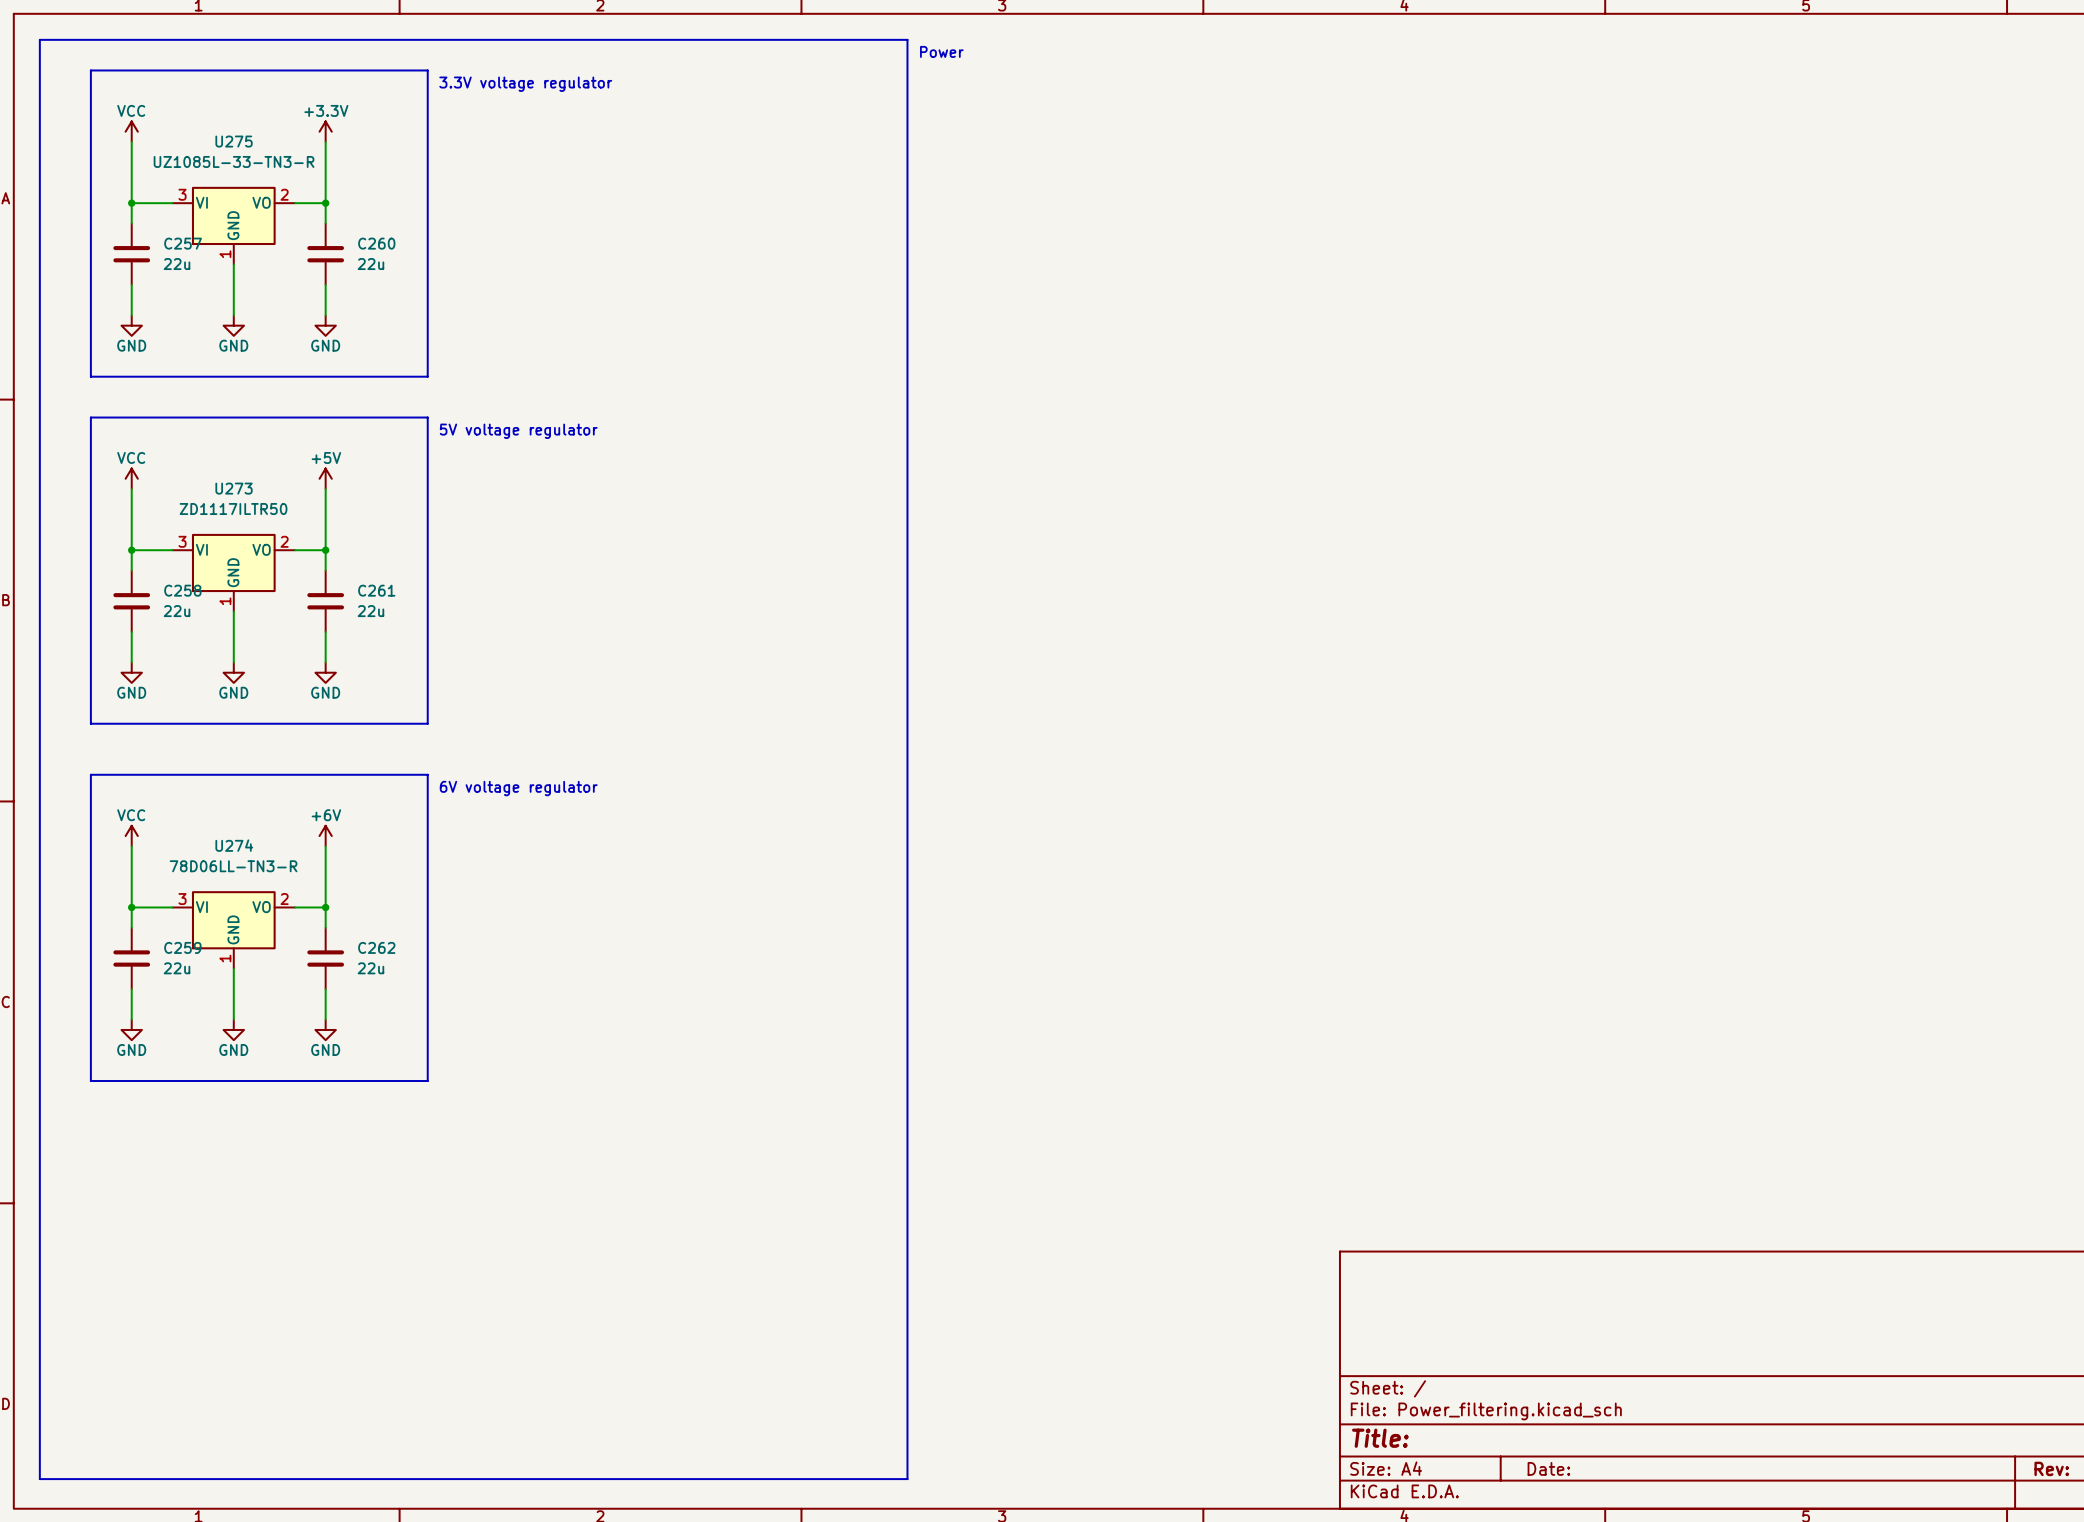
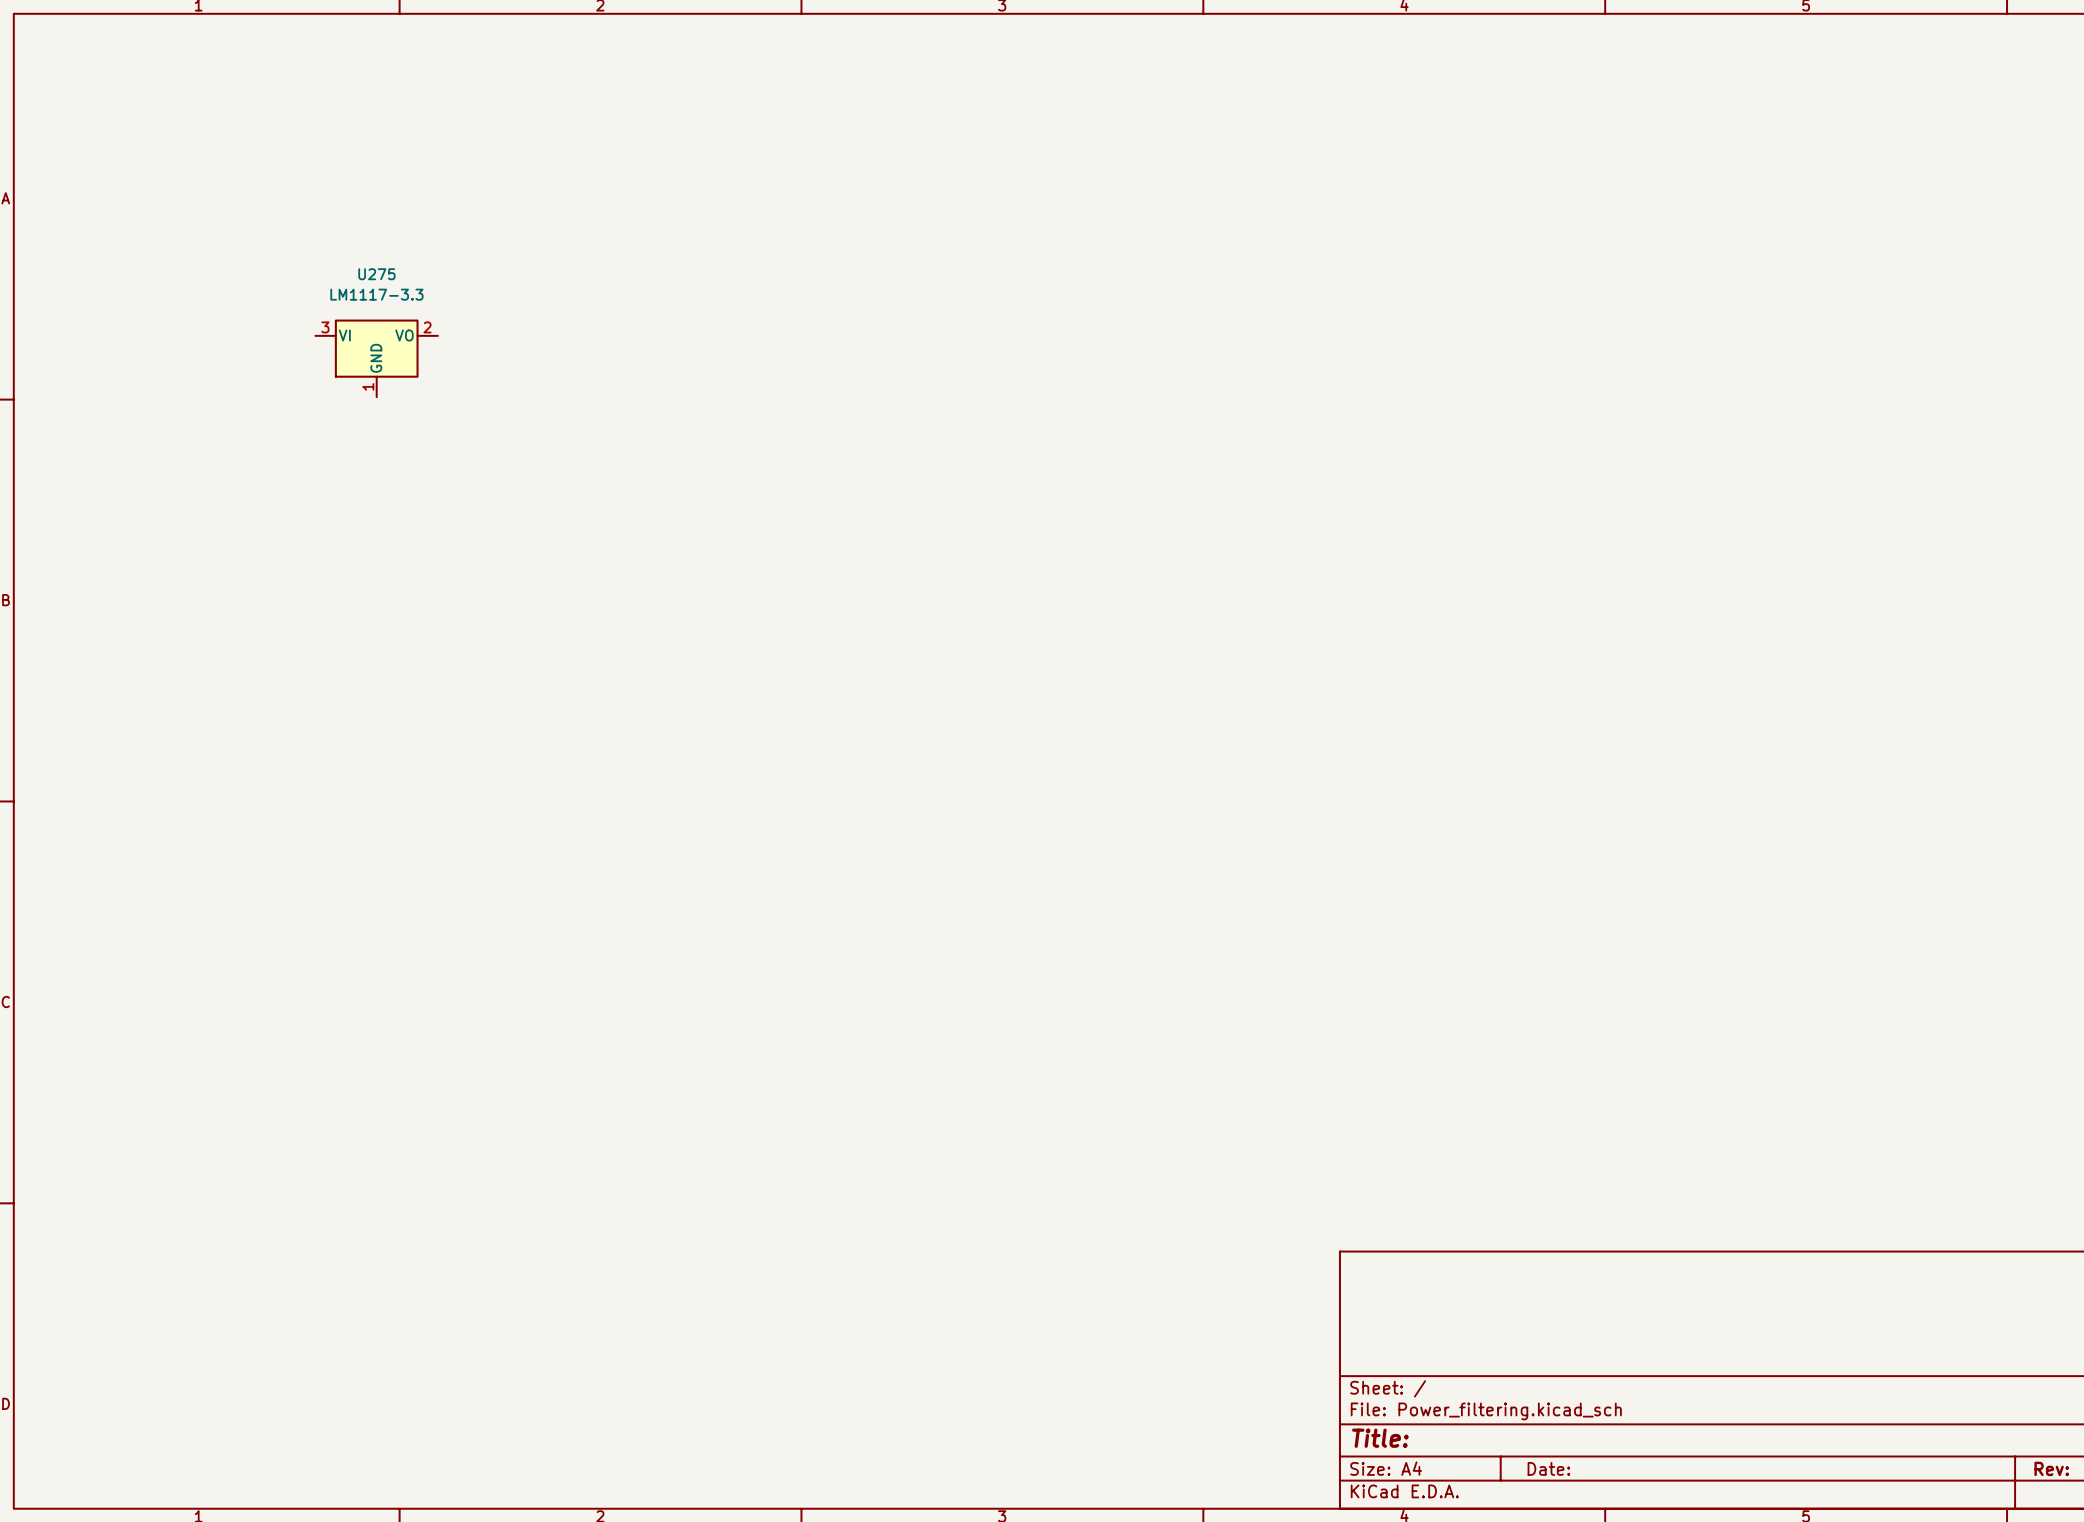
line: (39, 39) (907, 39) (907, 1479) (39, 1479) (39, 39) -> none
text: Power (941, 51) -> none
line: (90, 70) (90, 376) (427, 376) (427, 70) (90, 70) -> none
text: 3.3V voltage regulator (525, 84) -> none
power symbol: VCC (131, 131) -> none
power symbol: +3.3V (325, 131) -> none
wire: (131, 141) (131, 223) -> none
wire: (325, 141) (325, 223) -> none
U275 value: UZ1085L-33-TN3-R (234, 161) -> LM1117-3.3 (376, 294)
wire: (131, 203) (172, 203) -> none
junction: (131, 203) -> none
wire: (295, 203) (325, 203) -> none
junction: (325, 203) -> none
U275 position: (233, 225) -> (376, 358)
C257: 22u (131, 254) -> none
C260: 22u (325, 254) -> none
wire: (233, 264) (233, 315) -> none
wire: (131, 284) (131, 315) -> none
wire: (325, 284) (325, 315) -> none
power symbol: GND (131, 325) -> none
power symbol: GND (233, 325) -> none
power symbol: GND (325, 325) -> none
line: (90, 417) (90, 723) (427, 723) (427, 417) (90, 417) -> none
text: 5V voltage regulator (518, 431) -> none
power symbol: VCC (131, 478) -> none
power symbol: +5V (325, 478) -> none
wire: (131, 488) (131, 570) -> none
wire: (325, 488) (325, 570) -> none
wire: (131, 550) (172, 550) -> none
junction: (131, 550) -> none
wire: (295, 550) (325, 550) -> none
junction: (325, 550) -> none
U273: ZD1117ILTR50 (233, 572) -> none
C258: 22u (131, 601) -> none
C261: 22u (325, 601) -> none
wire: (233, 611) (233, 662) -> none
wire: (131, 631) (131, 662) -> none
wire: (325, 631) (325, 662) -> none
power symbol: GND (131, 672) -> none
power symbol: GND (233, 672) -> none
power symbol: GND (325, 672) -> none
line: (90, 774) (90, 1081) (427, 1081) (427, 774) (90, 774) -> none
text: 6V voltage regulator (518, 788) -> none
power symbol: VCC (131, 836) -> none
power symbol: +6V (325, 836) -> none
wire: (131, 846) (131, 927) -> none
wire: (325, 846) (325, 927) -> none
wire: (131, 907) (172, 907) -> none
junction: (131, 907) -> none
wire: (295, 907) (325, 907) -> none
junction: (325, 907) -> none
U274: 78D06LL-TN3-R (233, 929) -> none
C259: 22u (131, 958) -> none
C262: 22u (325, 958) -> none
wire: (233, 968) (233, 1019) -> none
wire: (131, 989) (131, 1019) -> none
wire: (325, 989) (325, 1019) -> none
power symbol: GND (131, 1029) -> none
power symbol: GND (233, 1029) -> none
power symbol: GND (325, 1029) -> none

